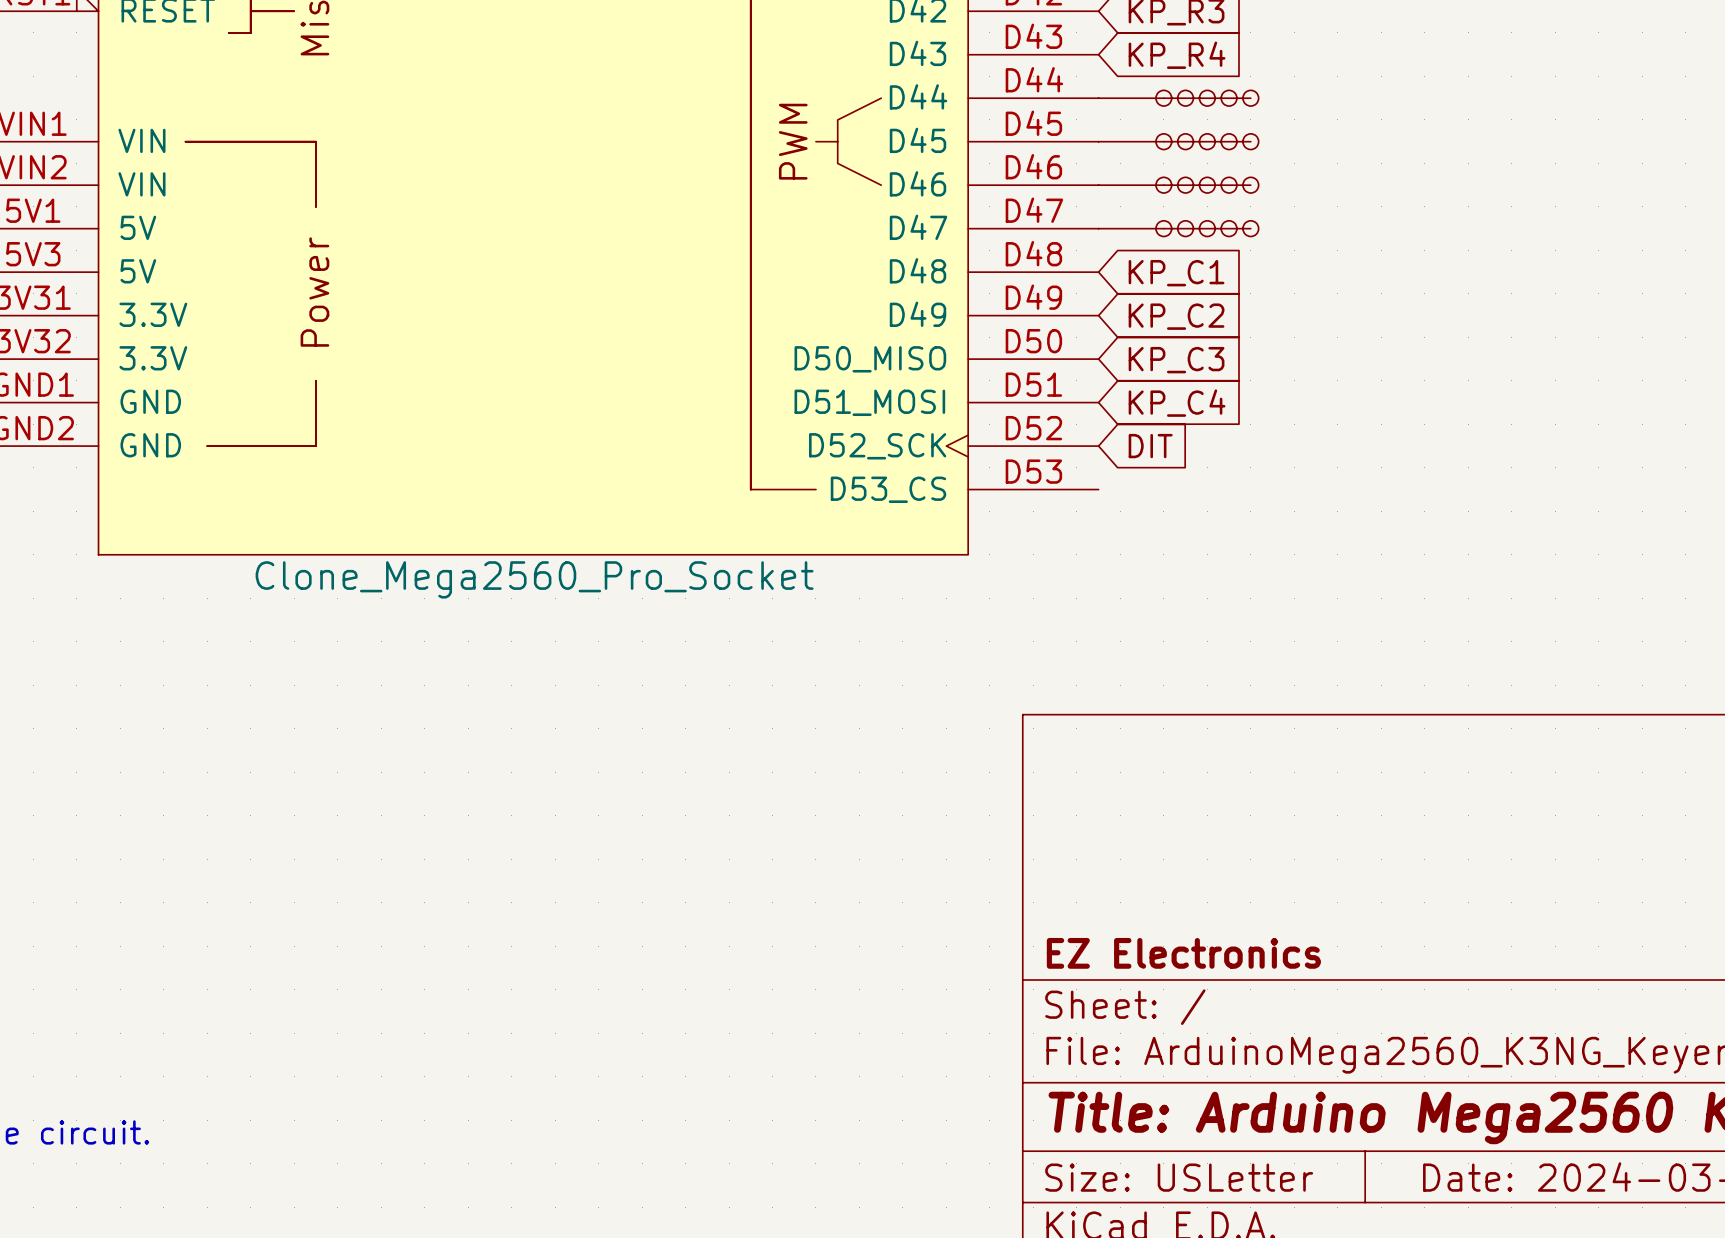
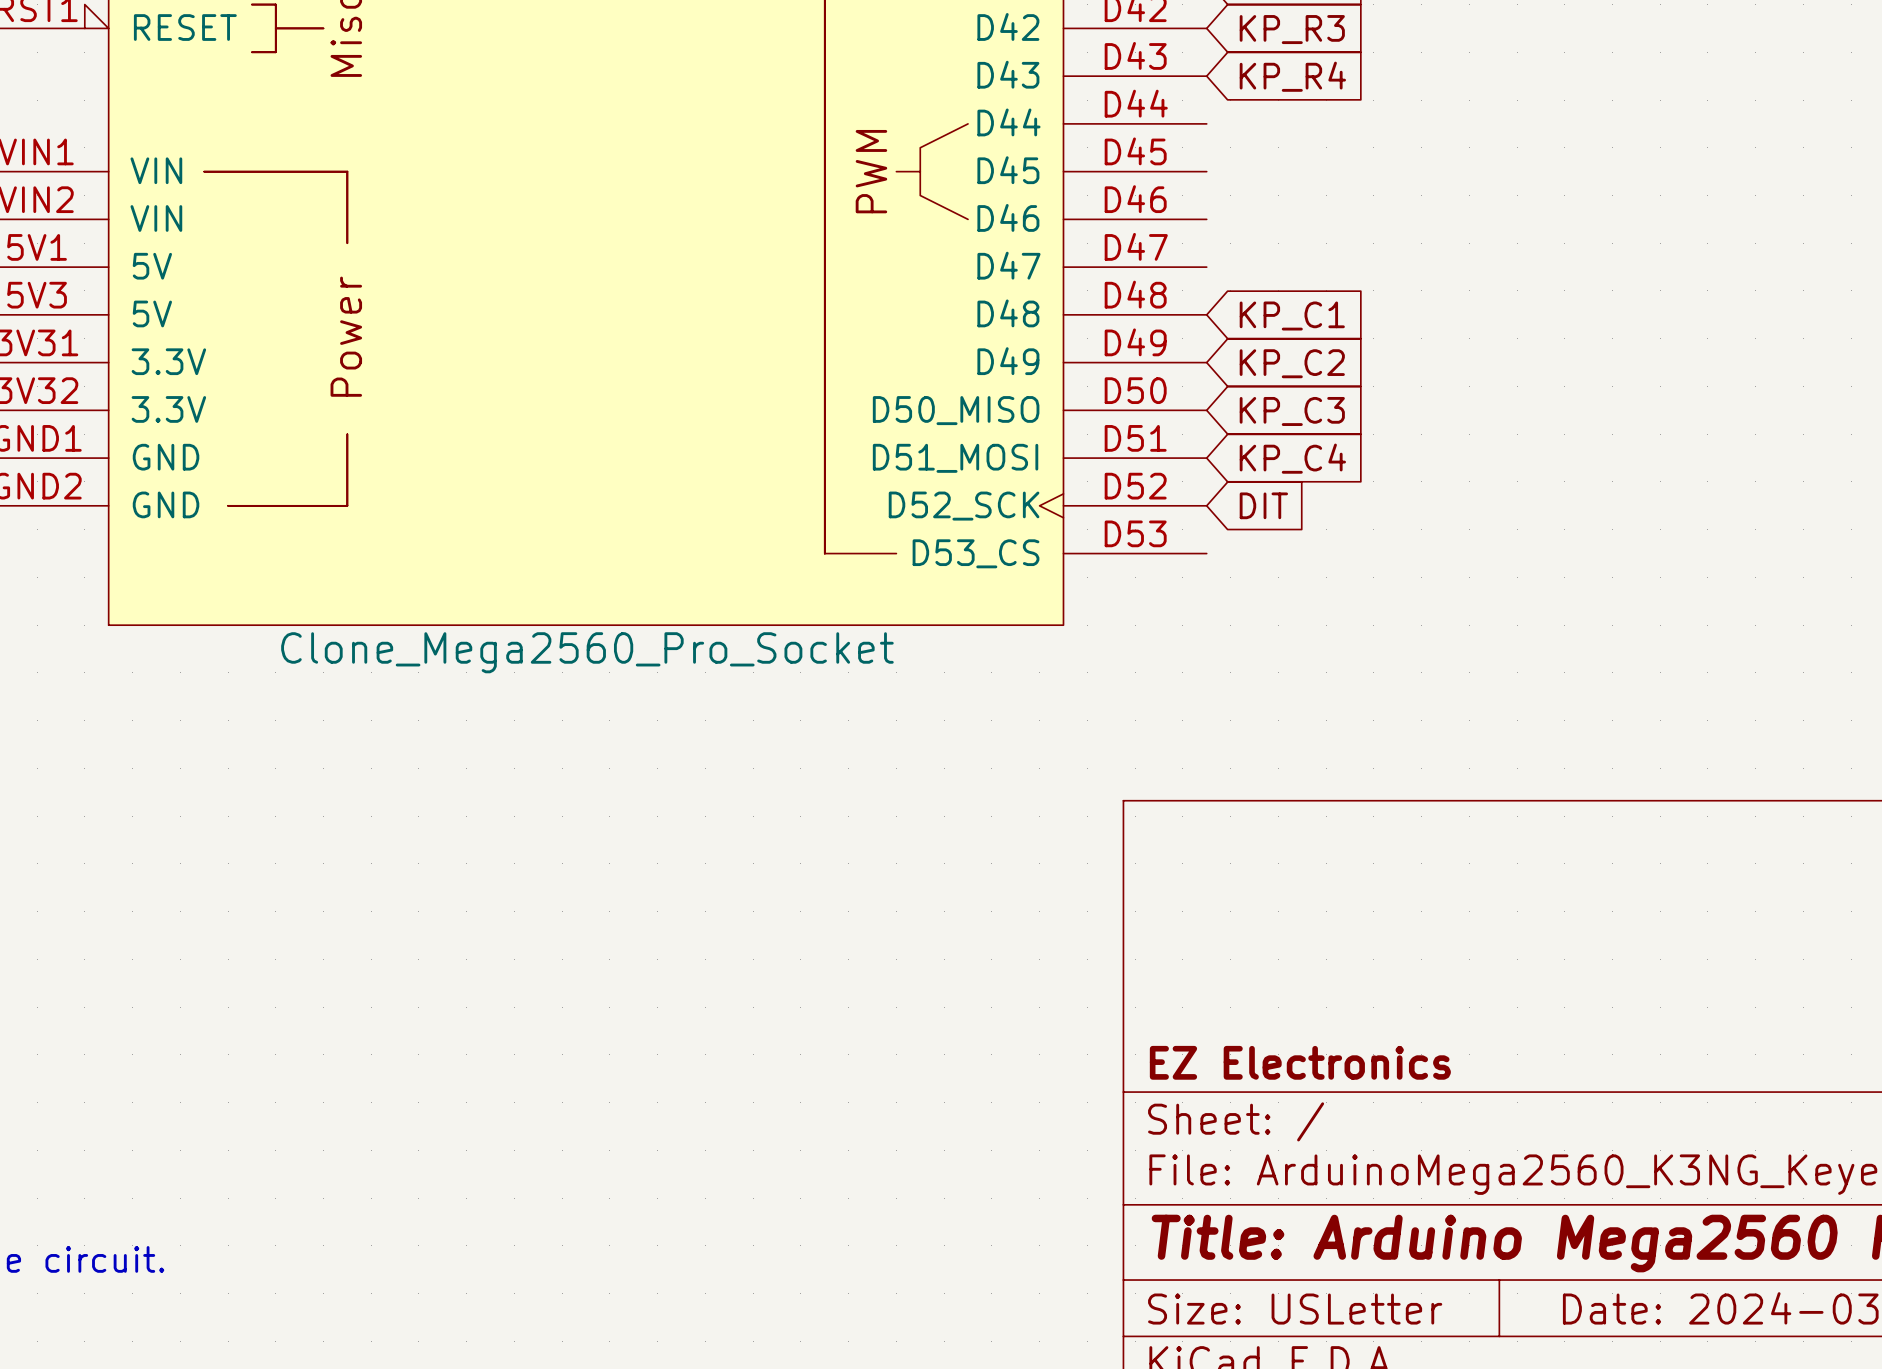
part: (1178, 98) -> none
part: (1178, 141) -> none
part: (1178, 185) -> none
part: (1178, 228) -> none

